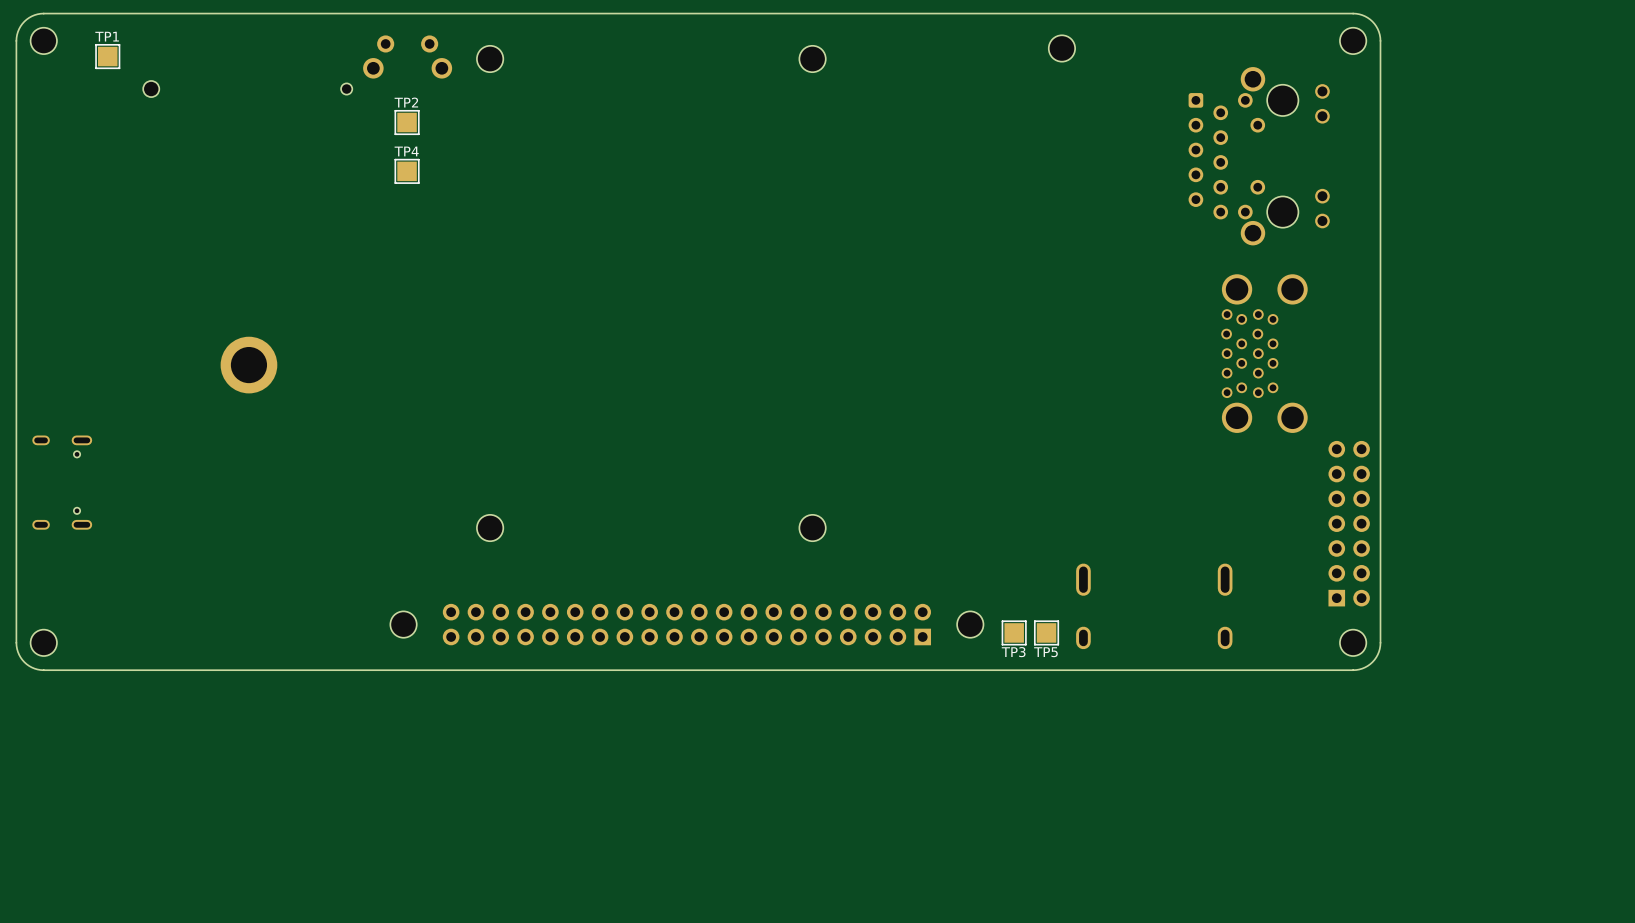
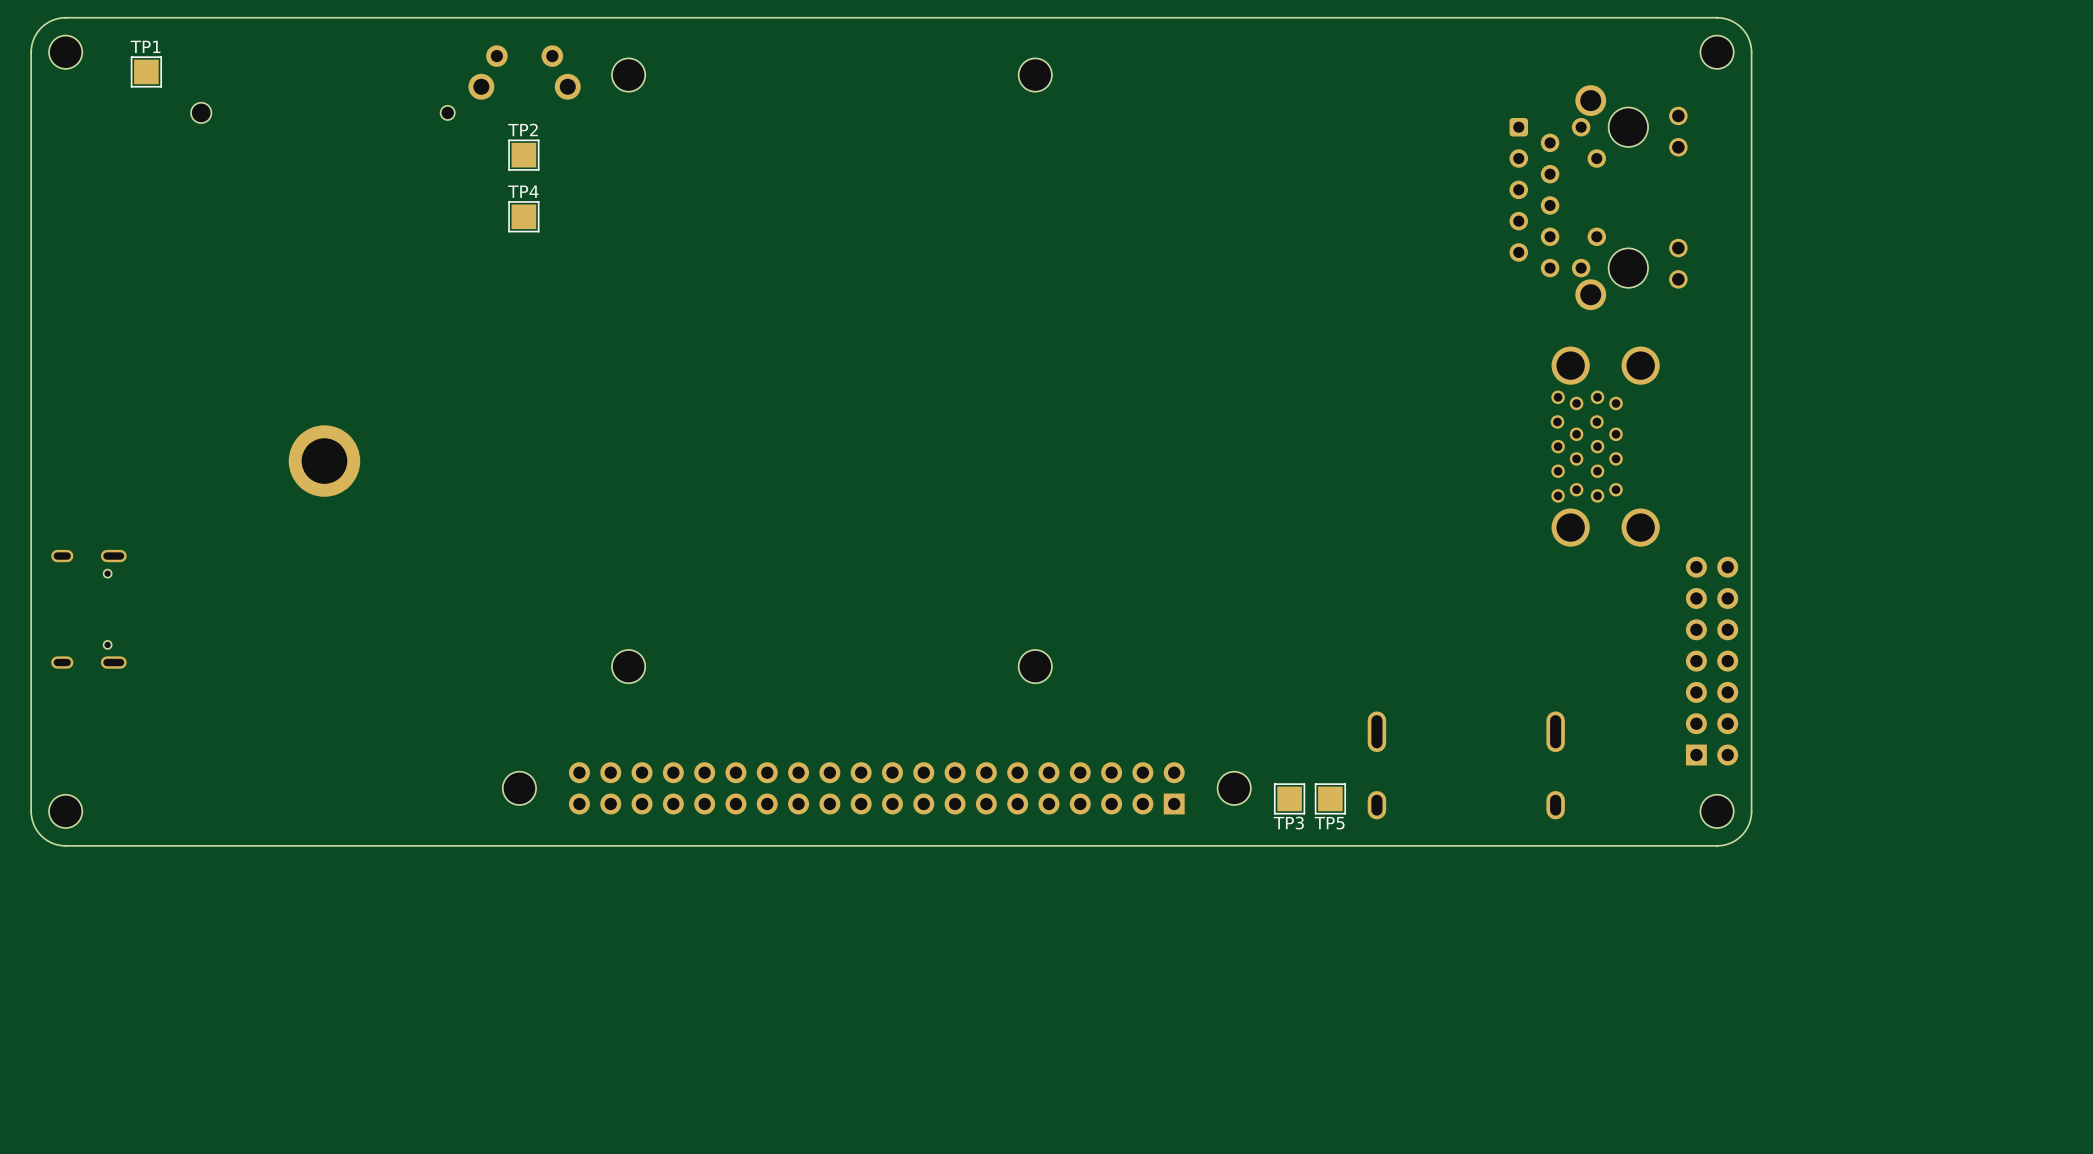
part: (1061, 48) -> none

